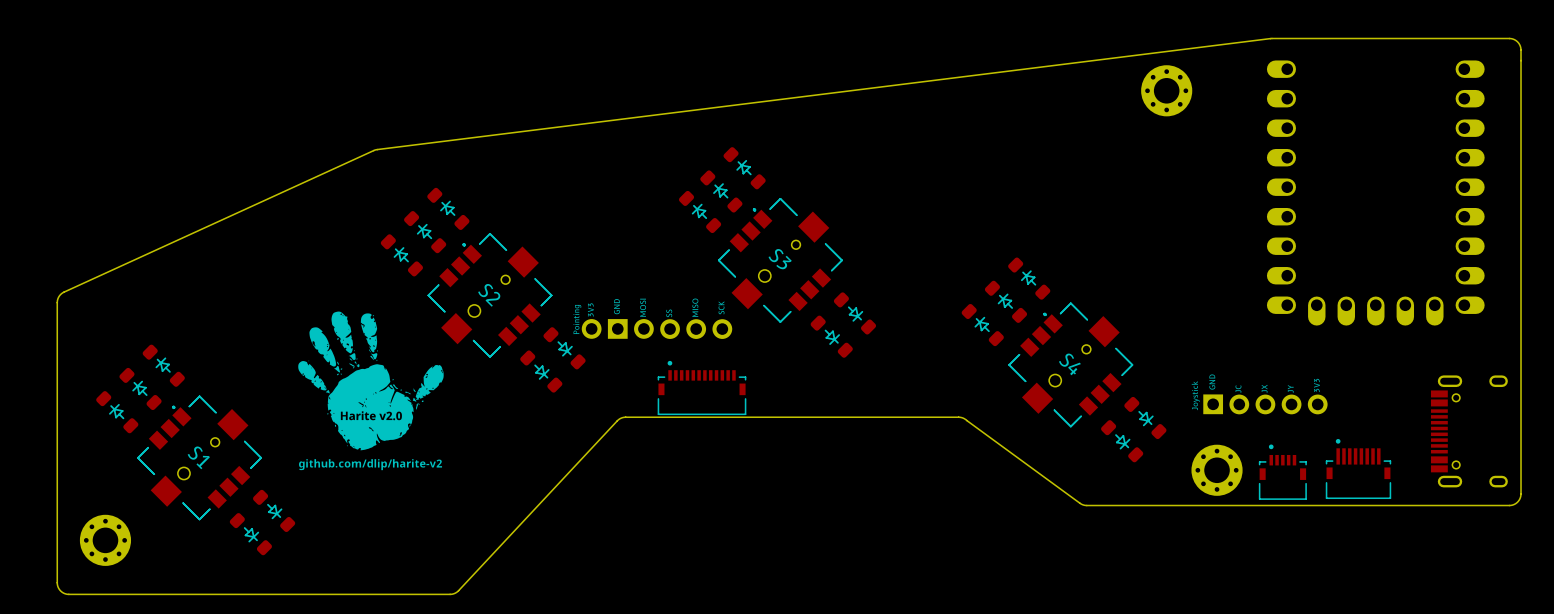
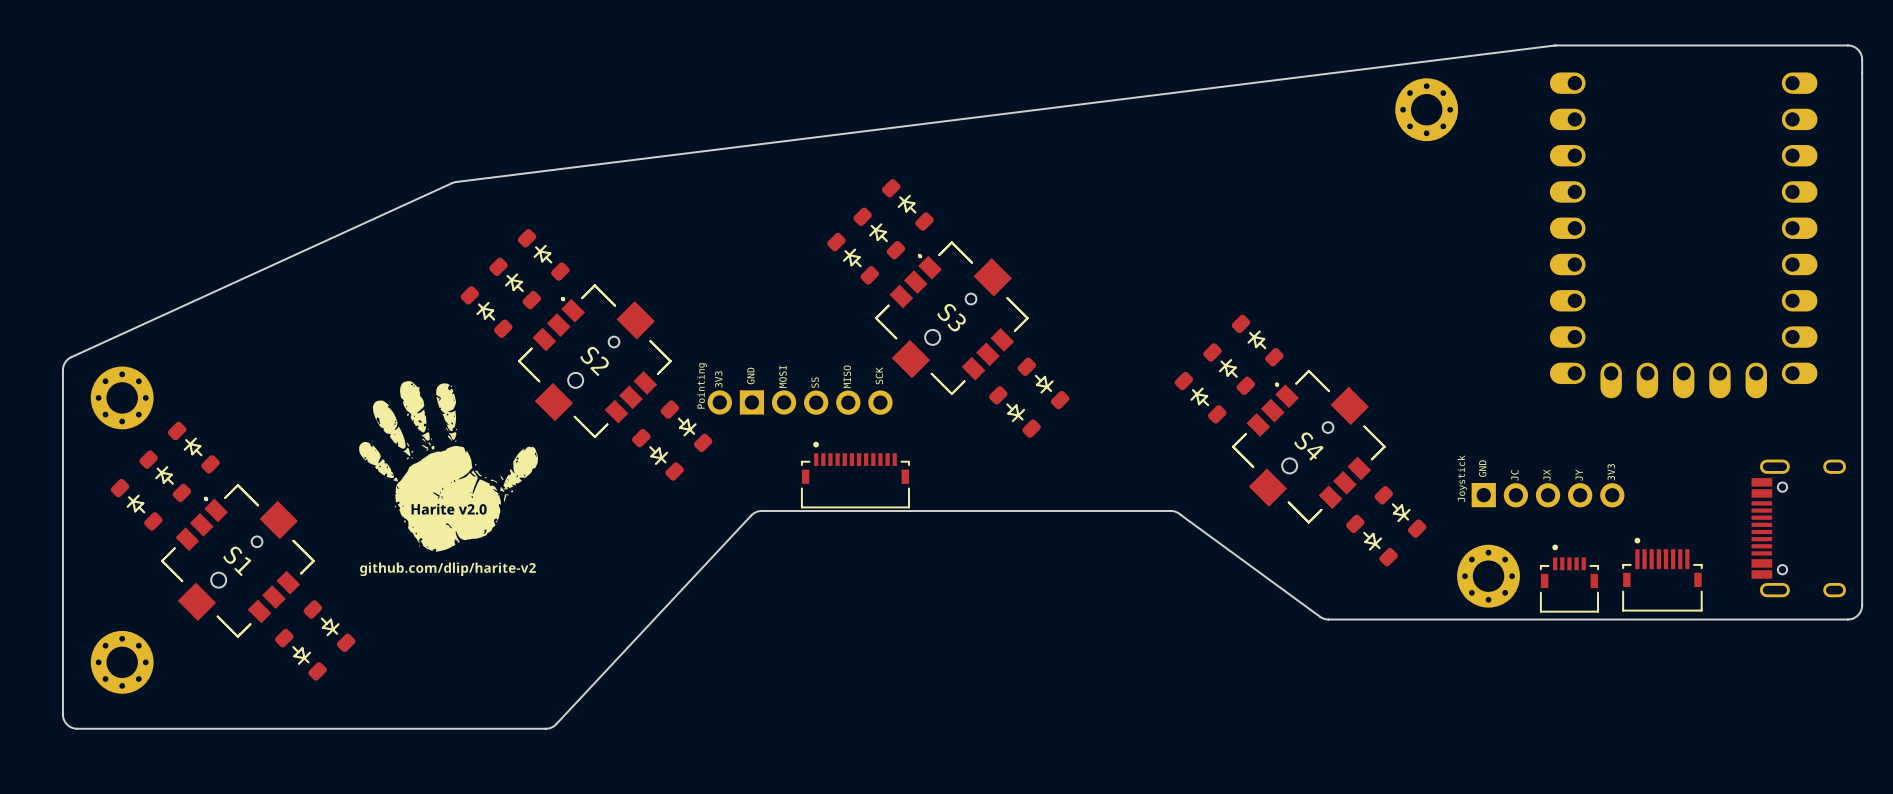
part: none -> (122, 397)

